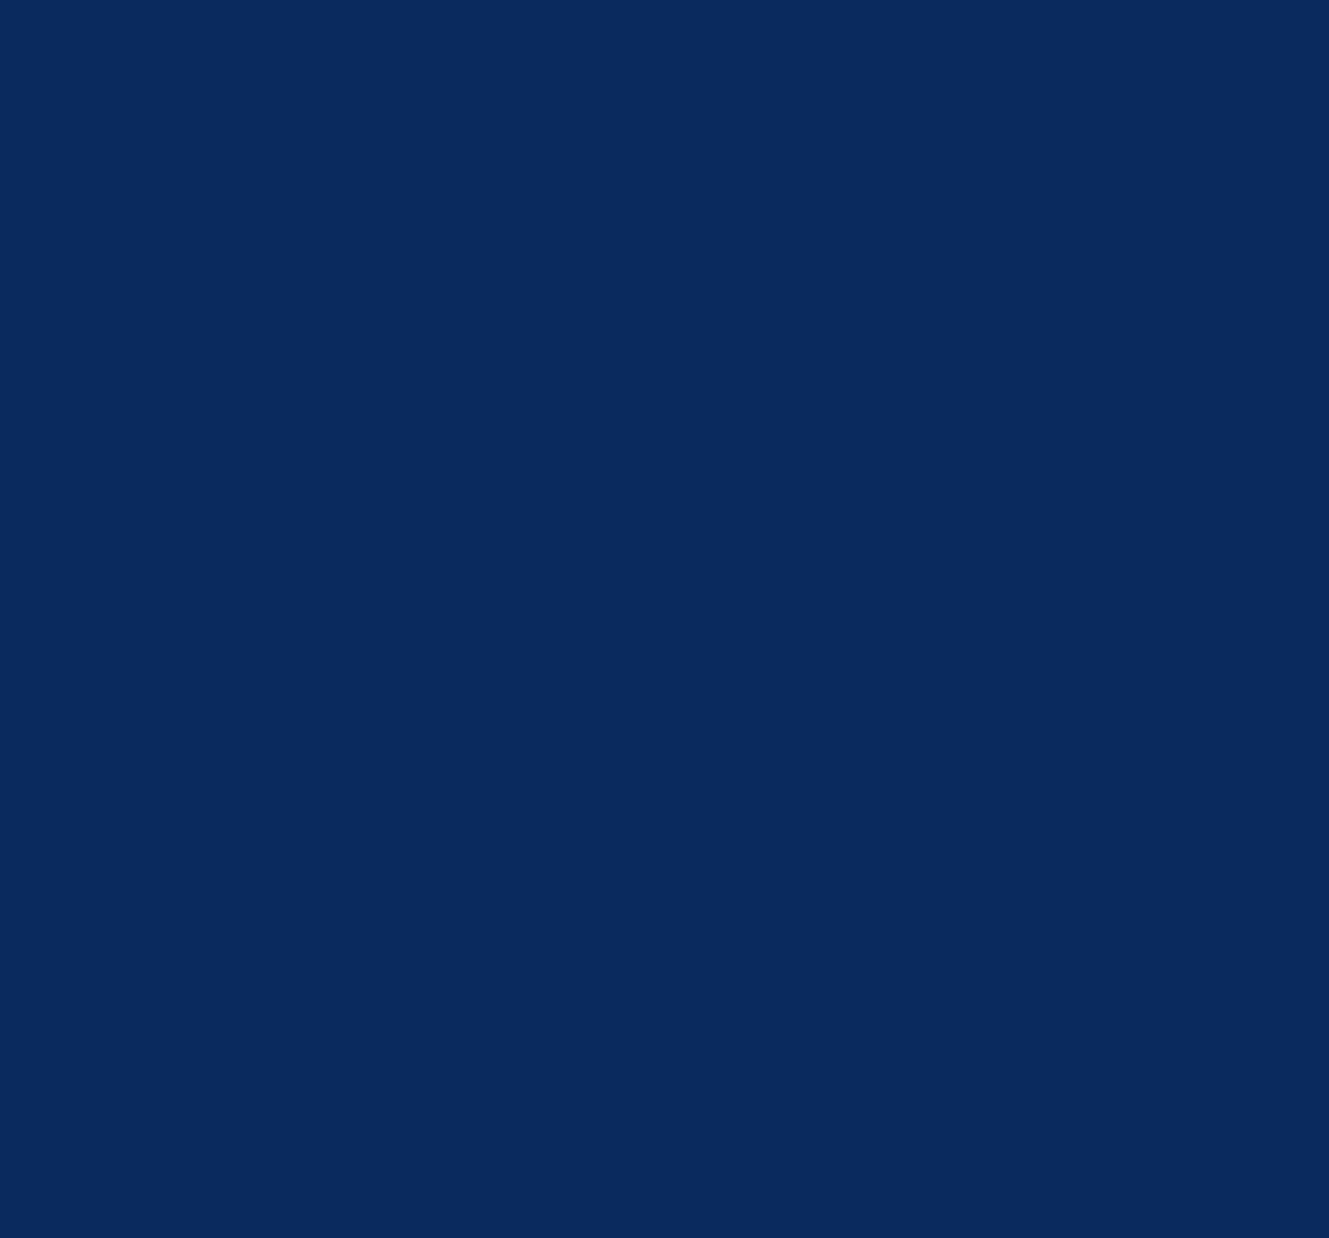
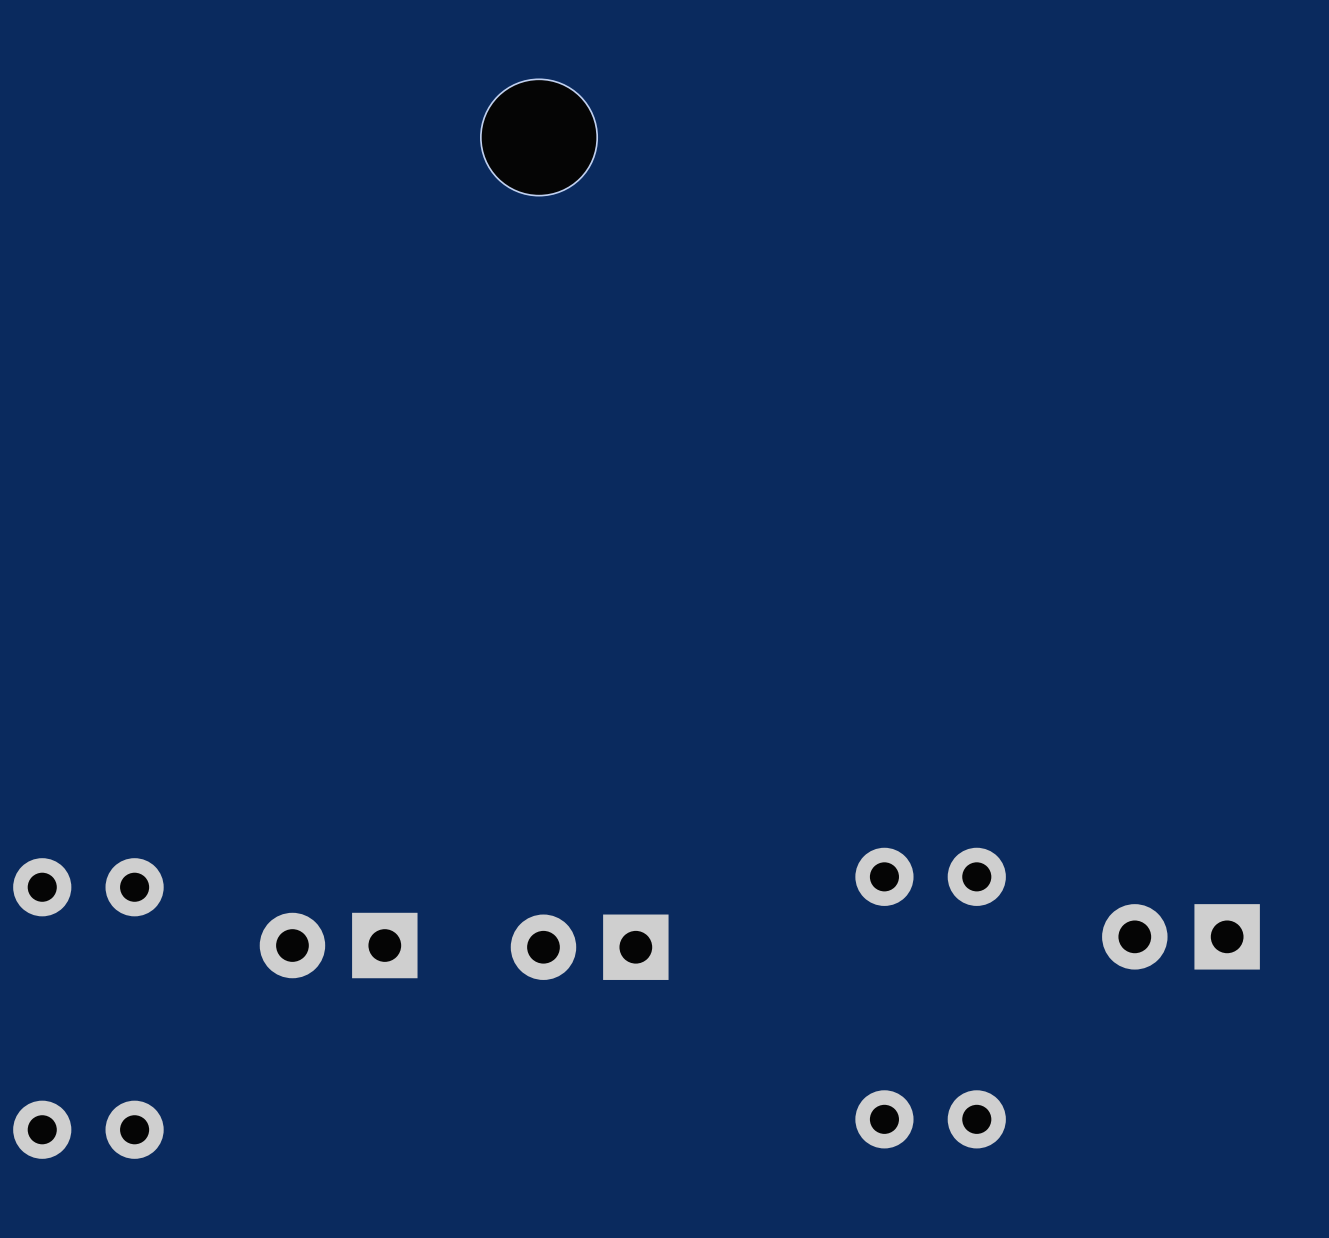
part: none -> (539, 137)
part: none -> (930, 876)
part: none -> (88, 887)
part: none -> (1180, 936)
part: none -> (338, 945)
part: none -> (589, 947)
part: none -> (930, 1119)
part: none -> (88, 1129)

